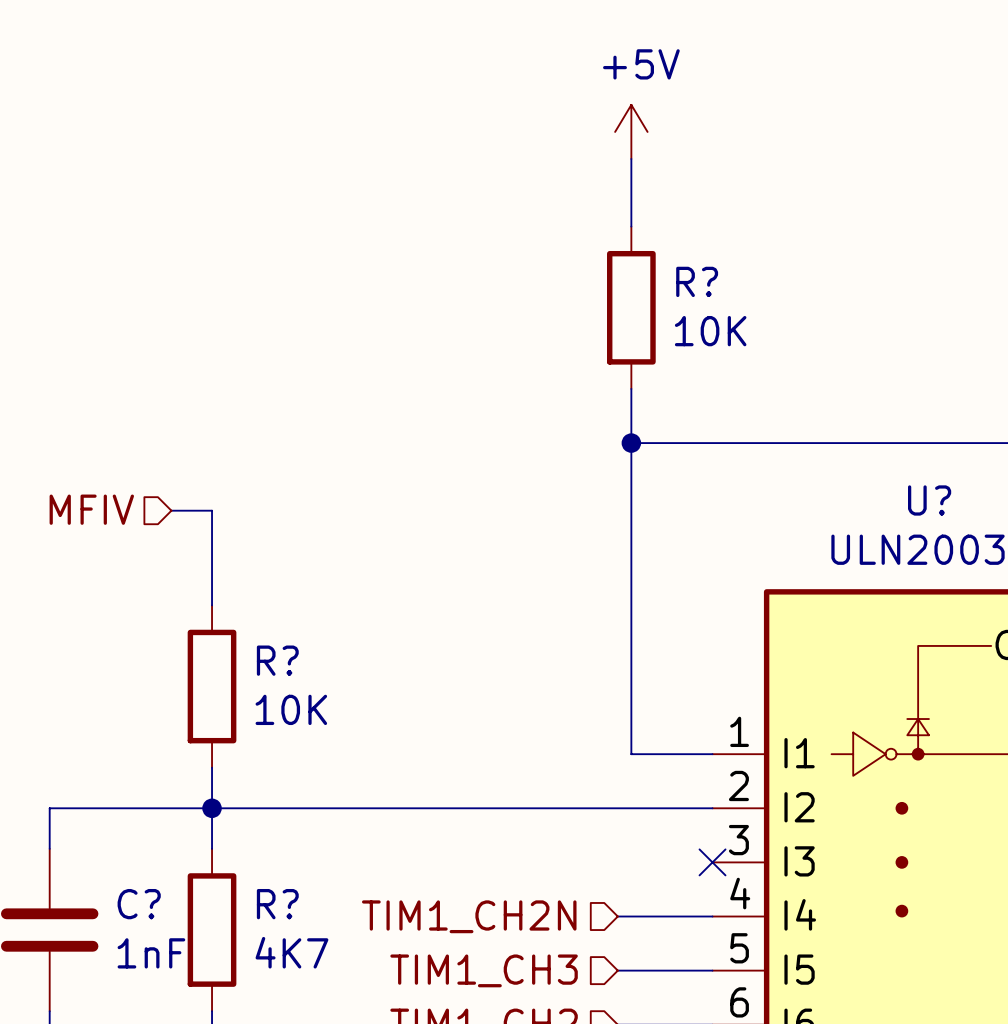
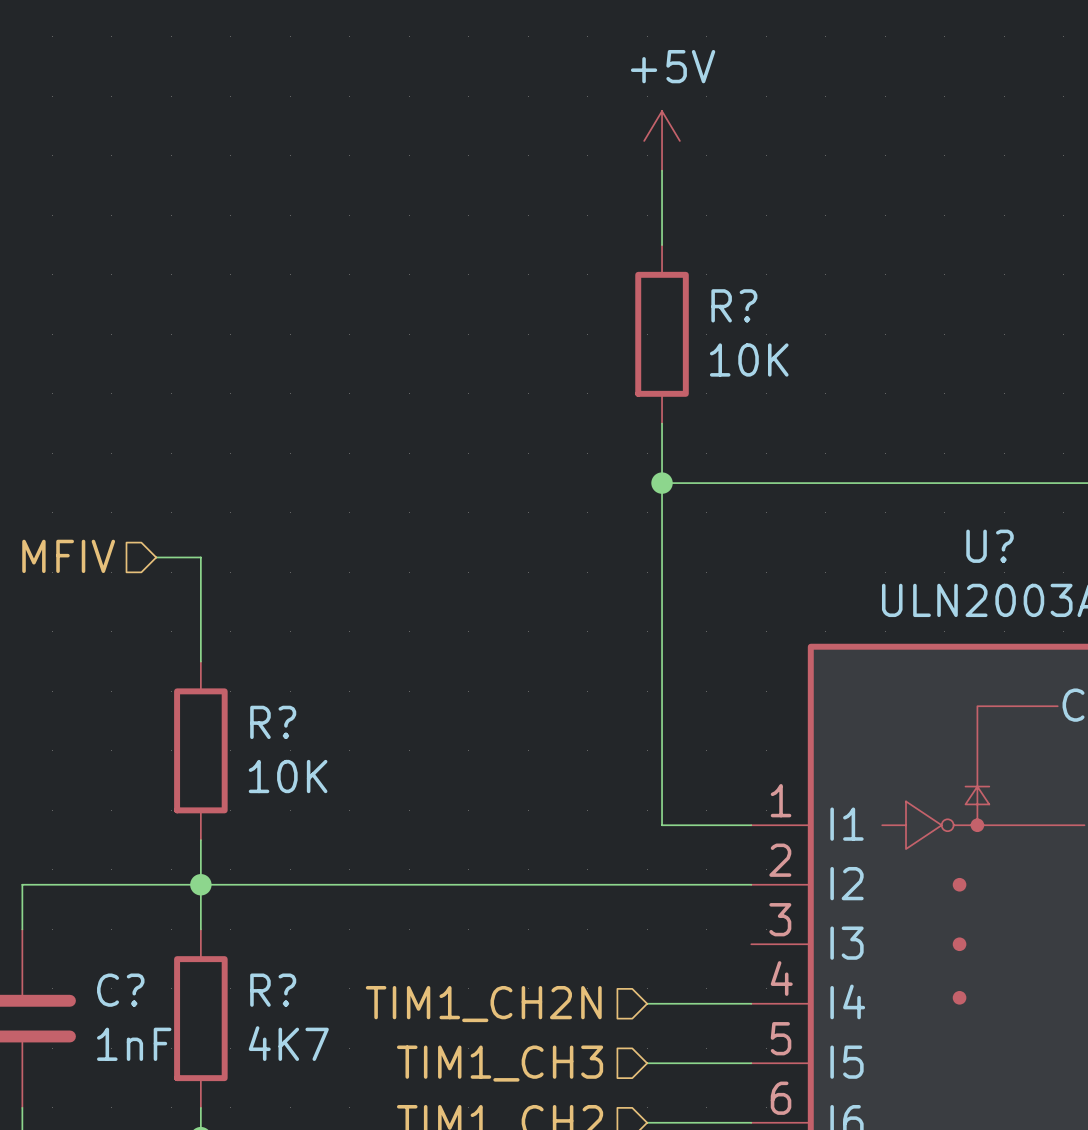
no-connect mark: (712, 862) -> none

